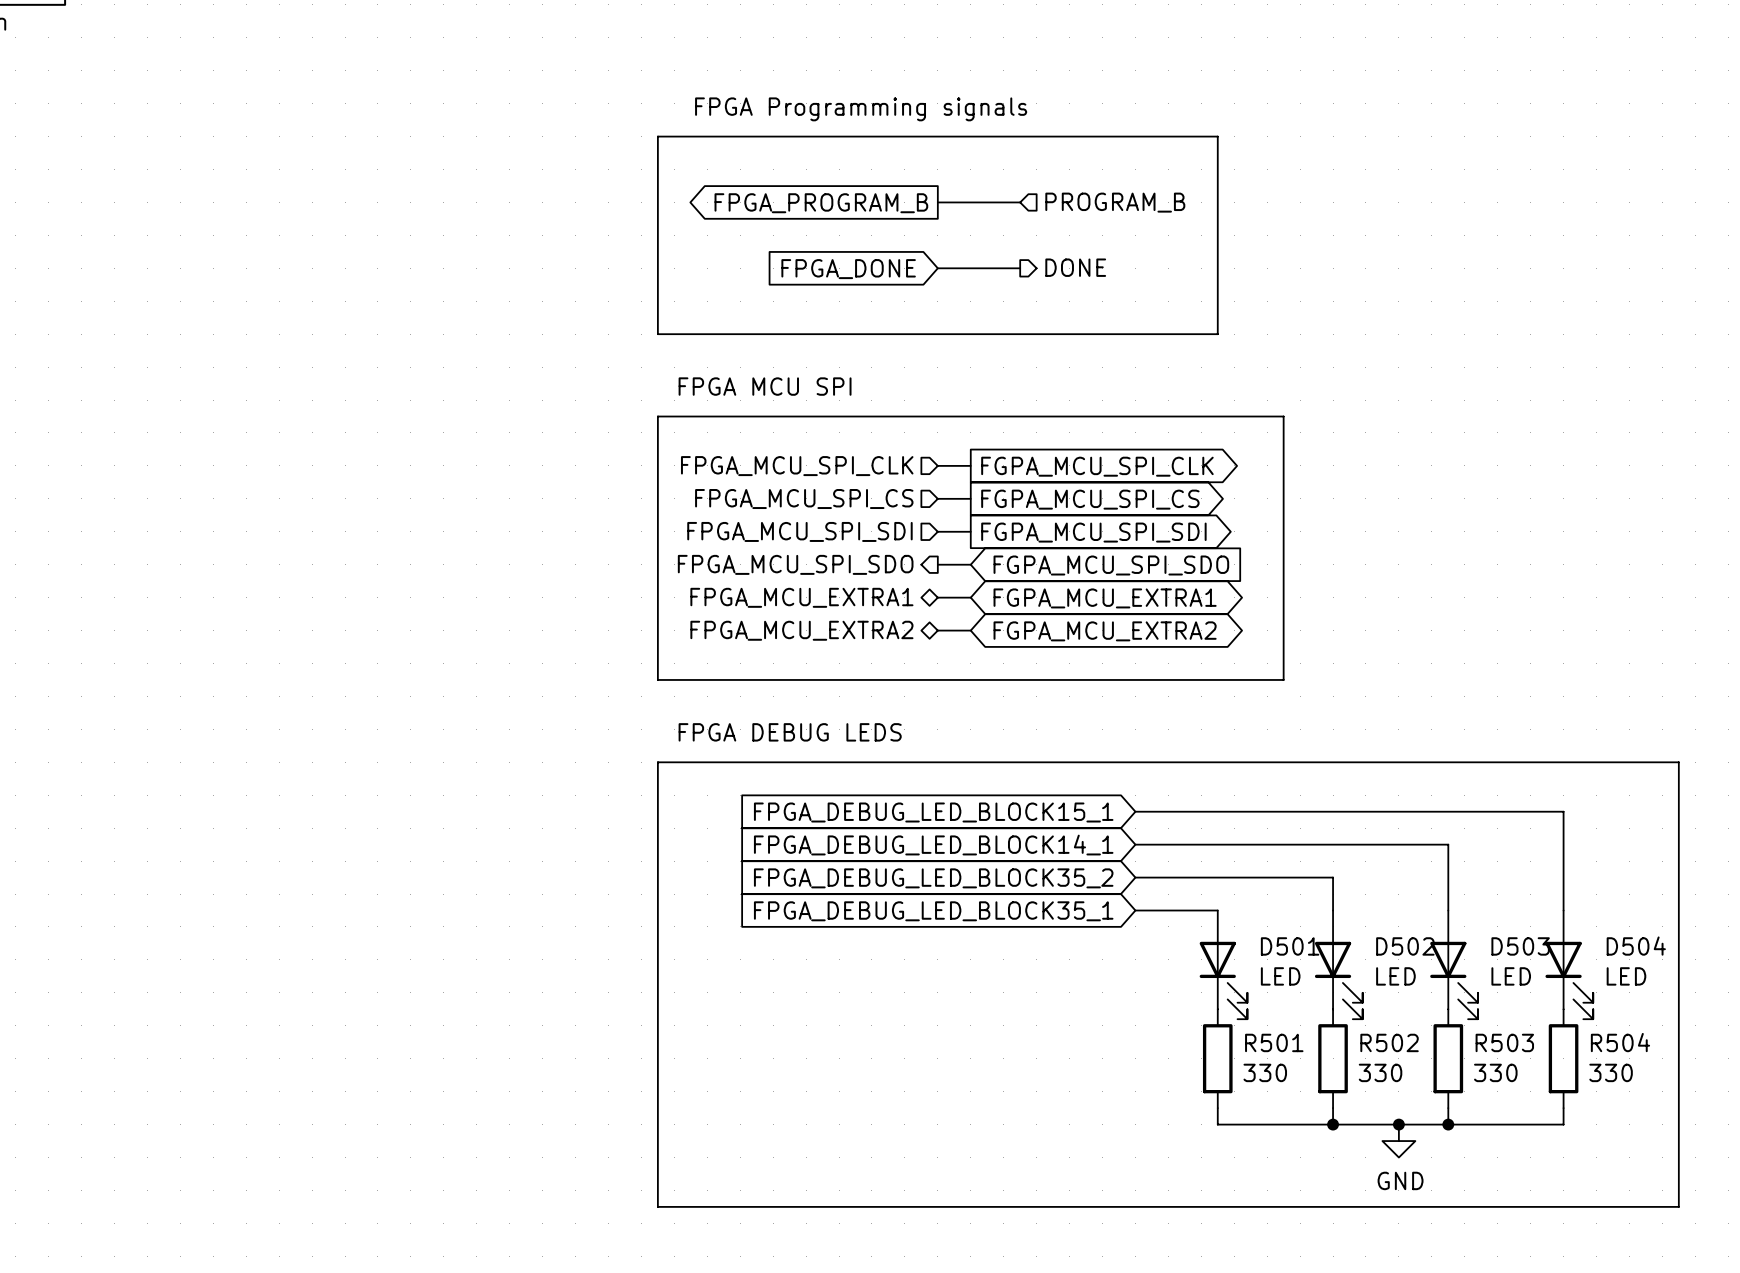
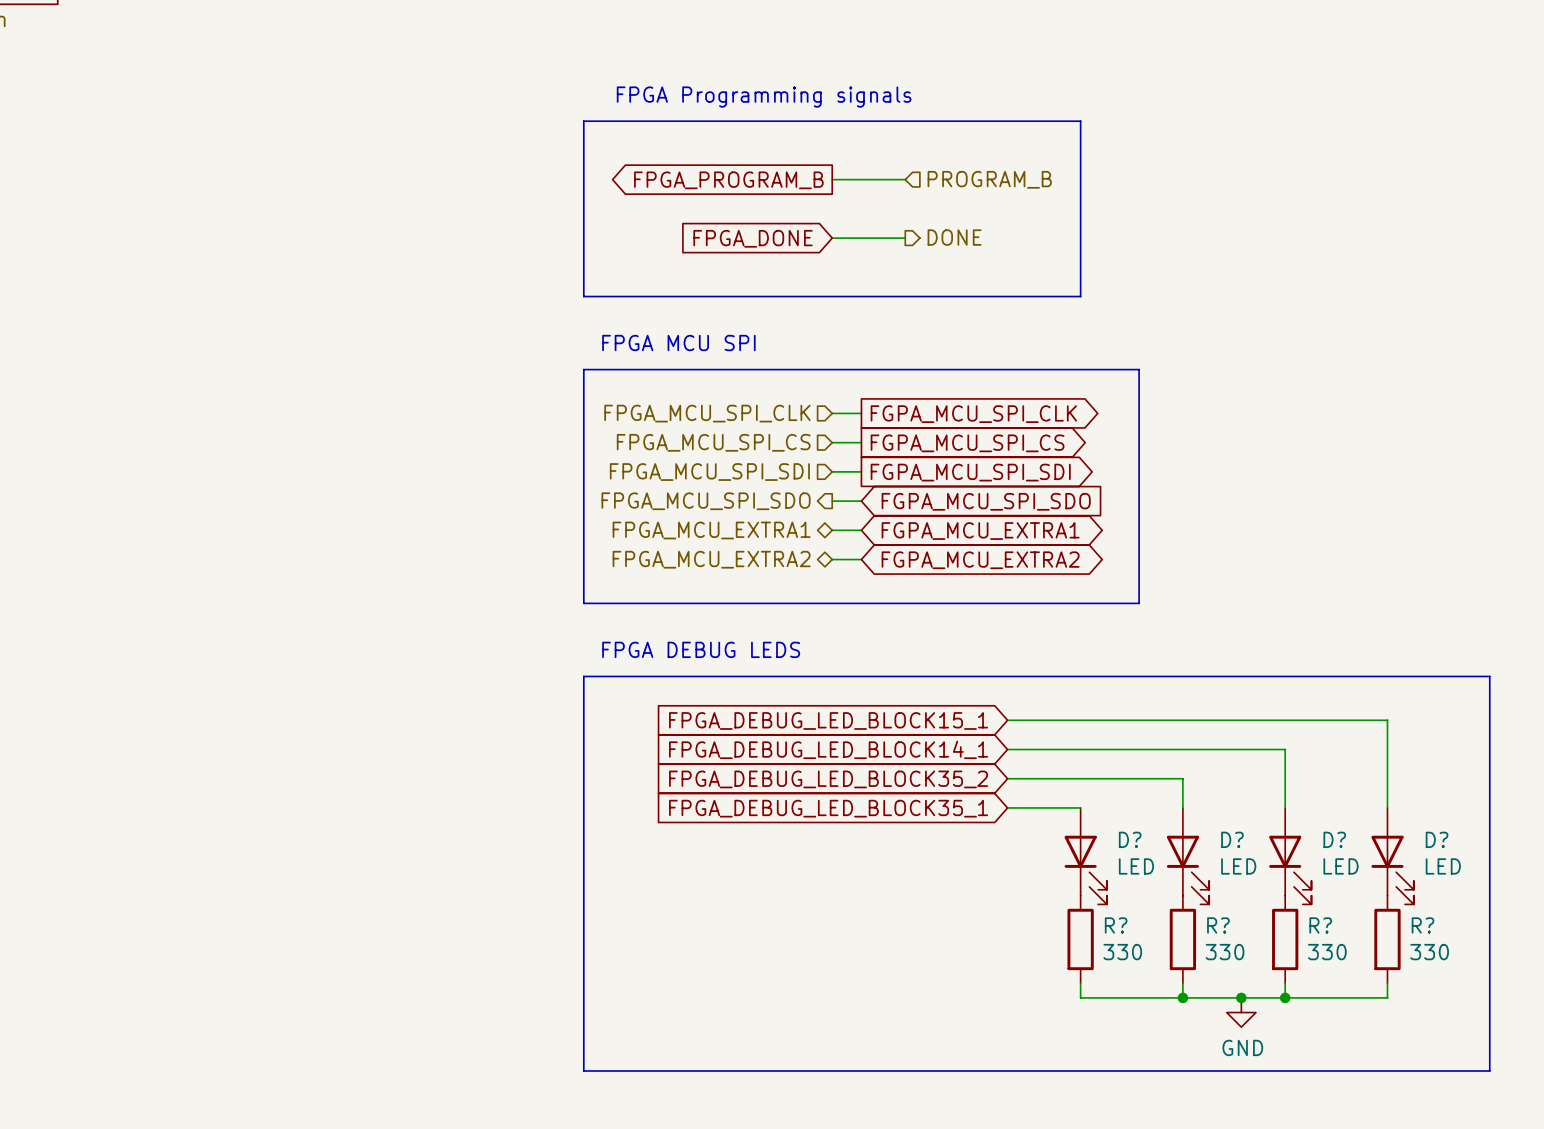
D501 name: D501 (1290, 946) -> D? (1130, 839)
D502 name: D502 (1405, 946) -> D? (1232, 839)
D503 name: D503 (1520, 946) -> D? (1334, 839)
D504 name: D504 (1636, 946) -> D? (1437, 839)
R501 name: R501 (1274, 1042) -> R? (1116, 925)
R502 name: R502 (1389, 1042) -> R? (1218, 925)
R503 name: R503 (1504, 1042) -> R? (1320, 925)
R504 name: R504 (1620, 1042) -> R? (1423, 925)

